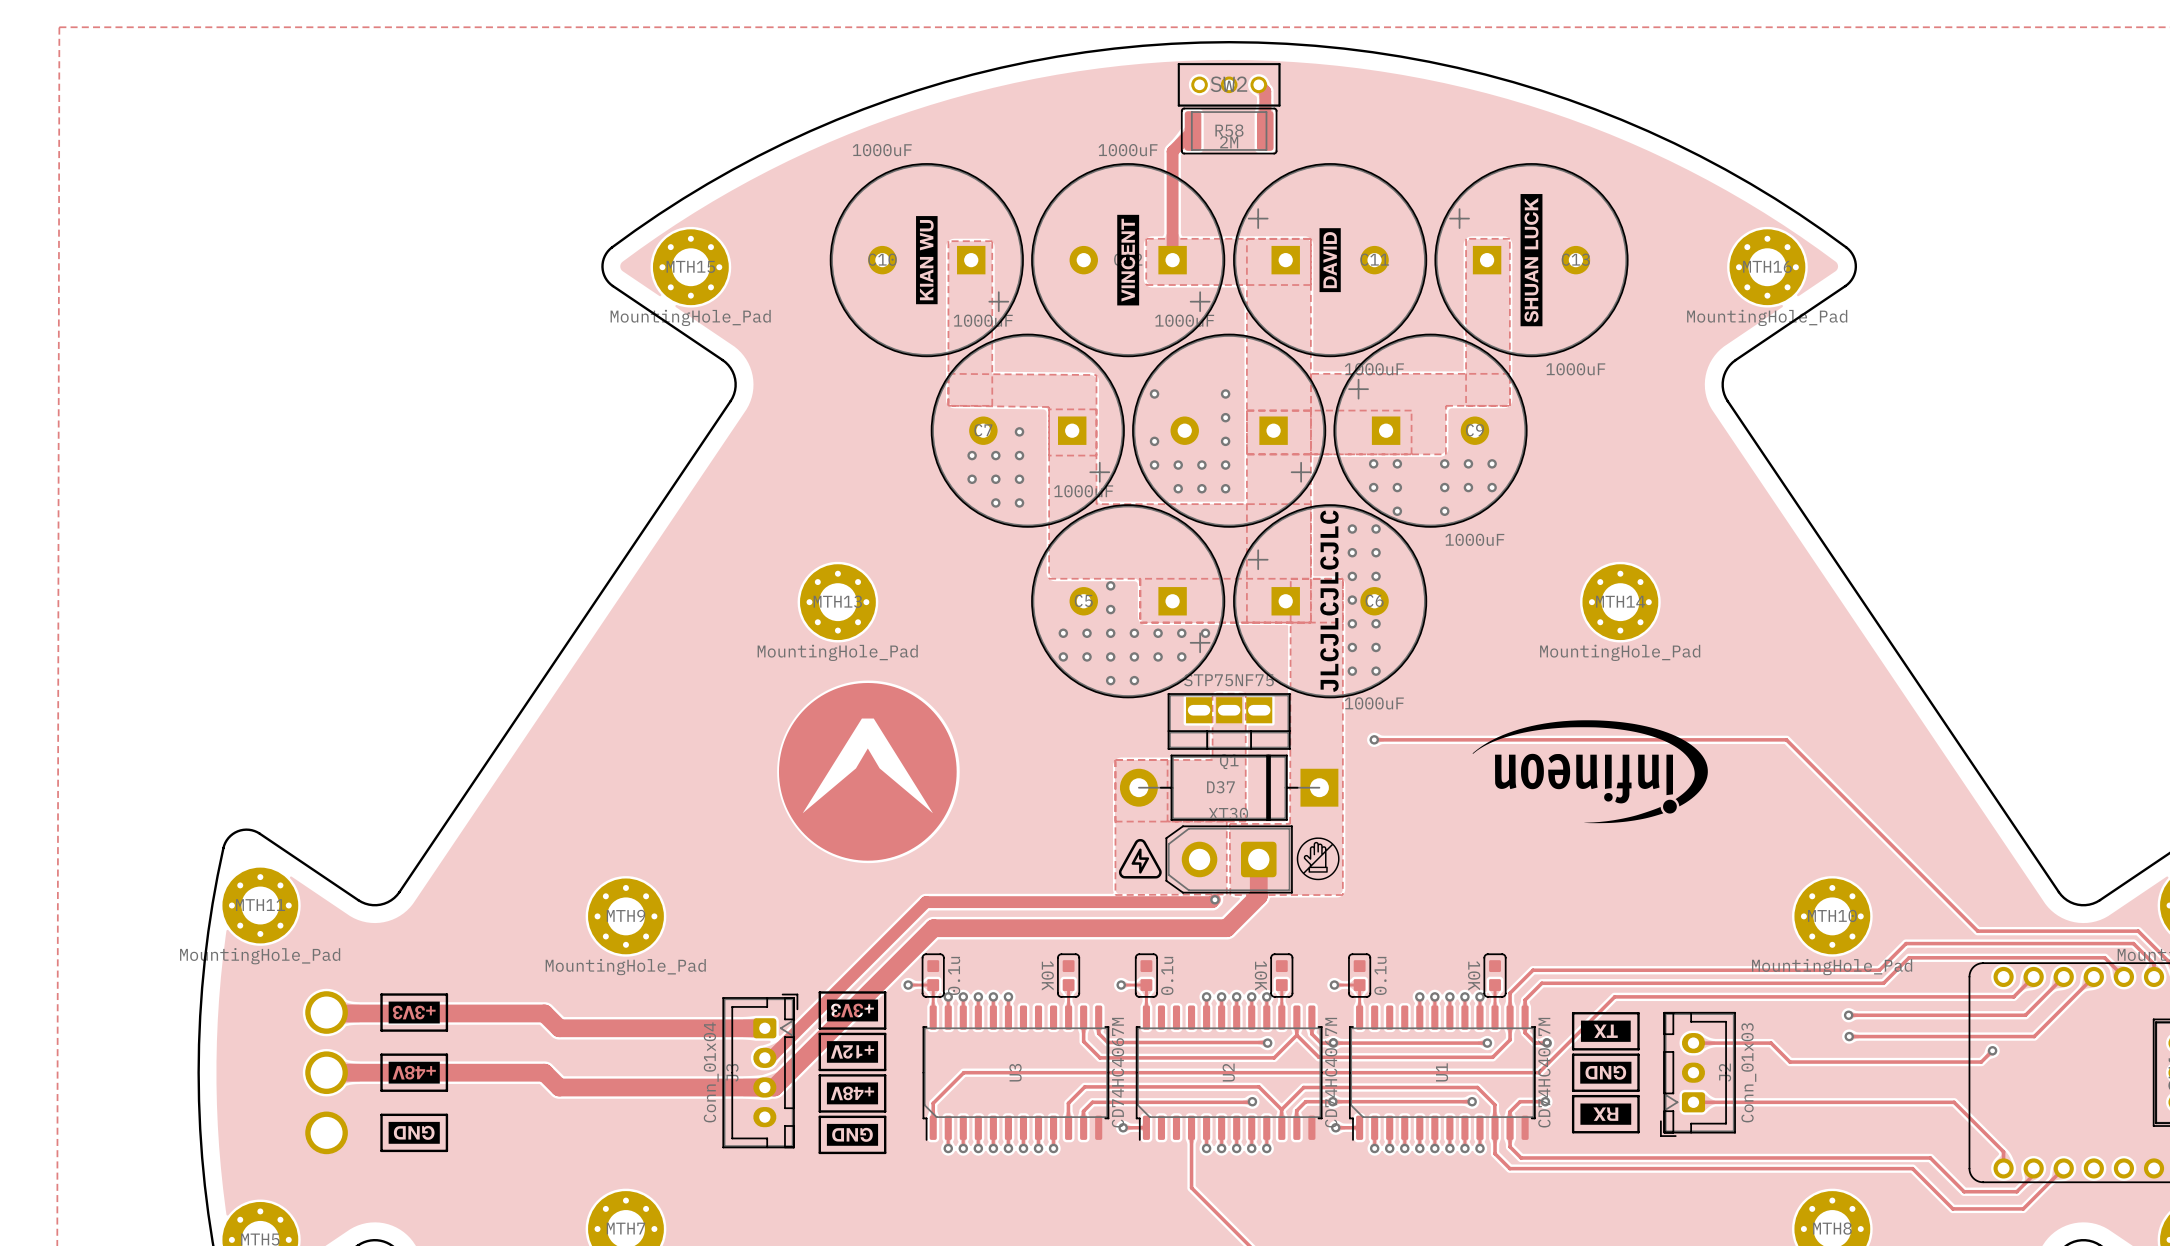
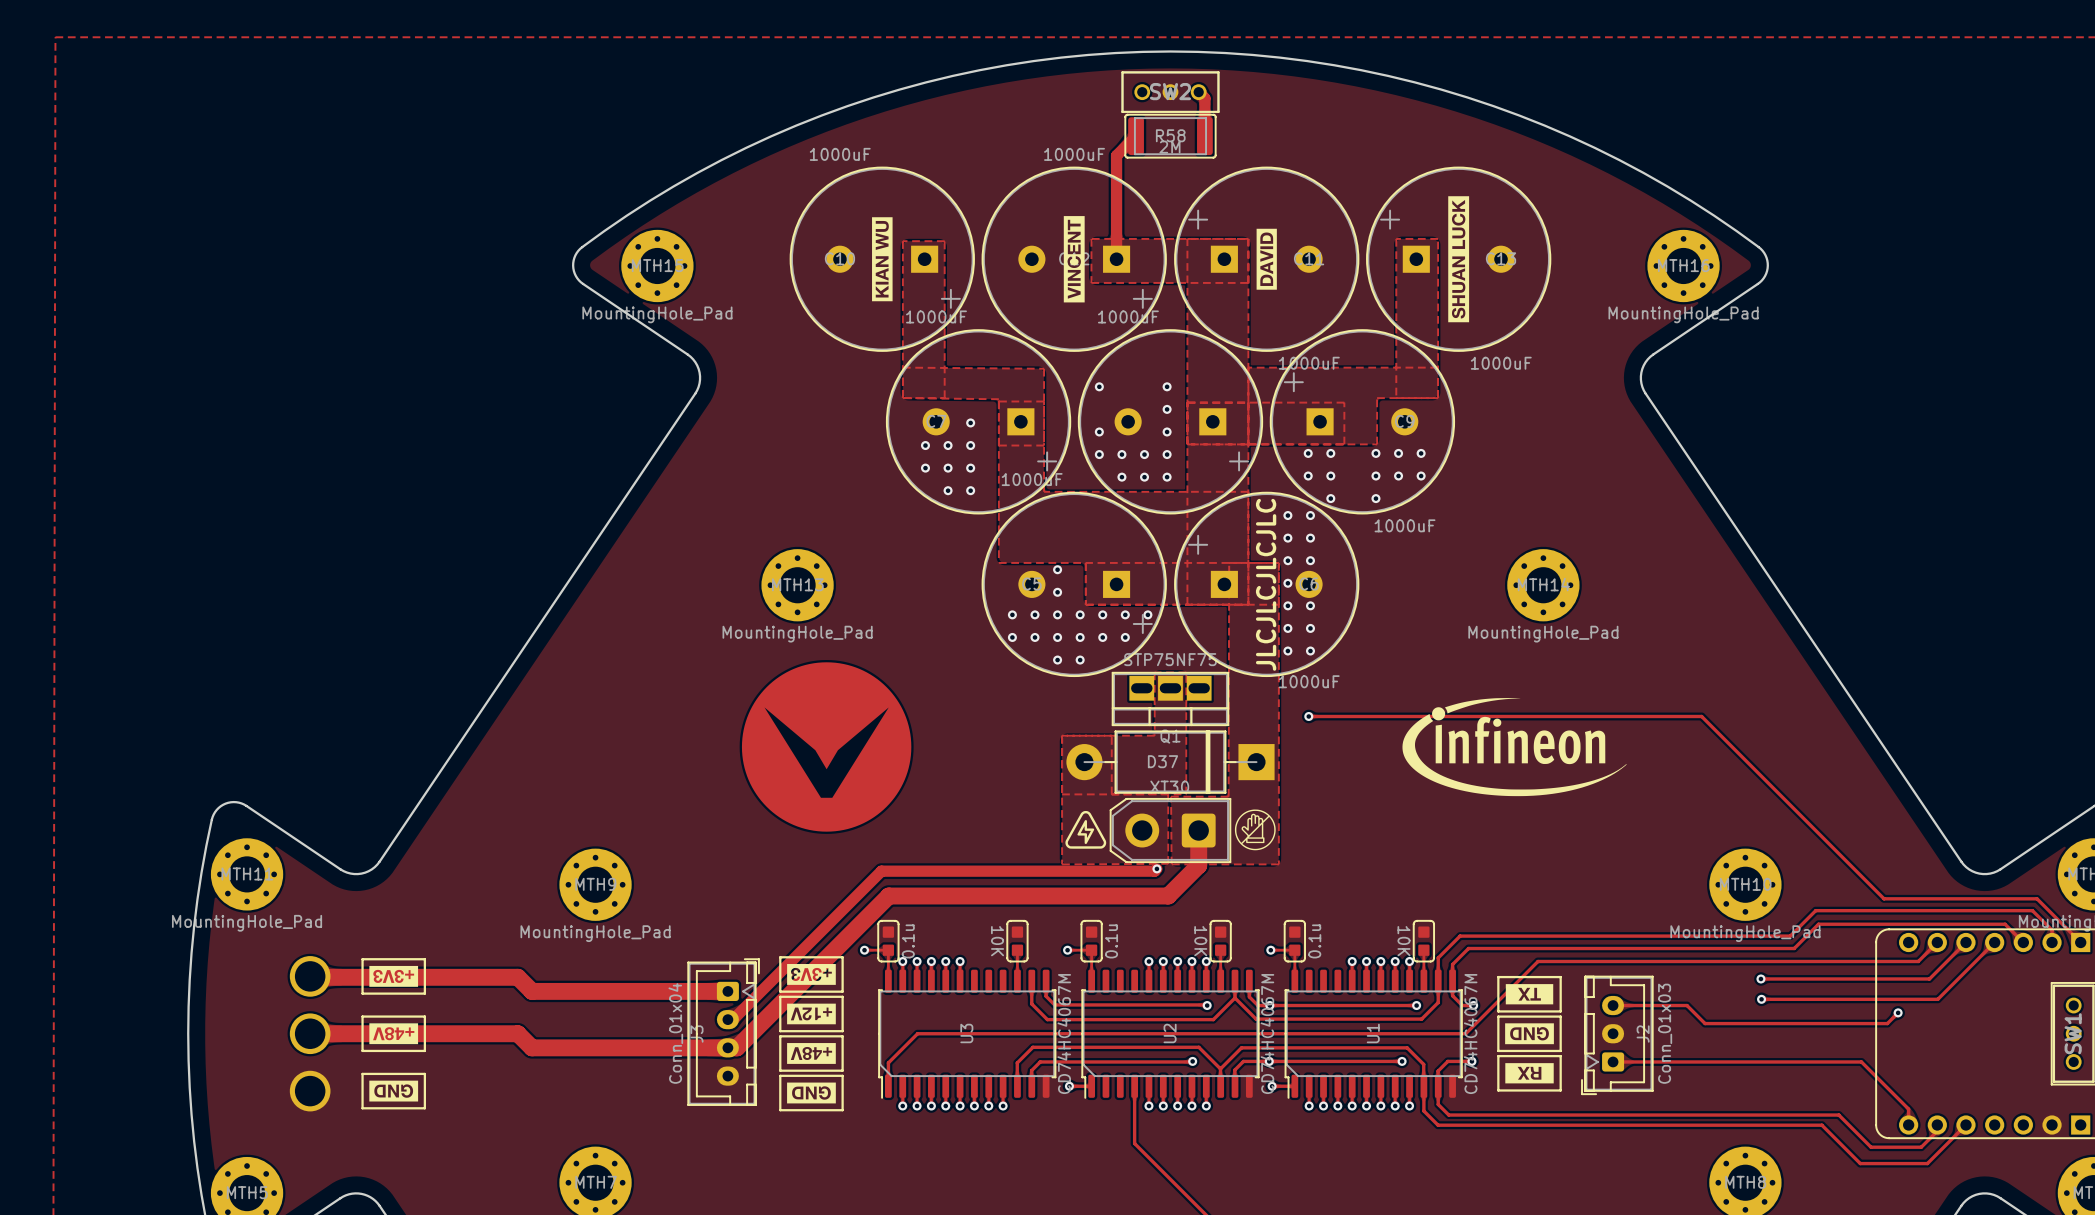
drawing shape: [1472, 720, 1708, 824] -> [1402, 698, 1627, 797]
part rotation: 0° (867, 771) -> 180° (826, 746)

